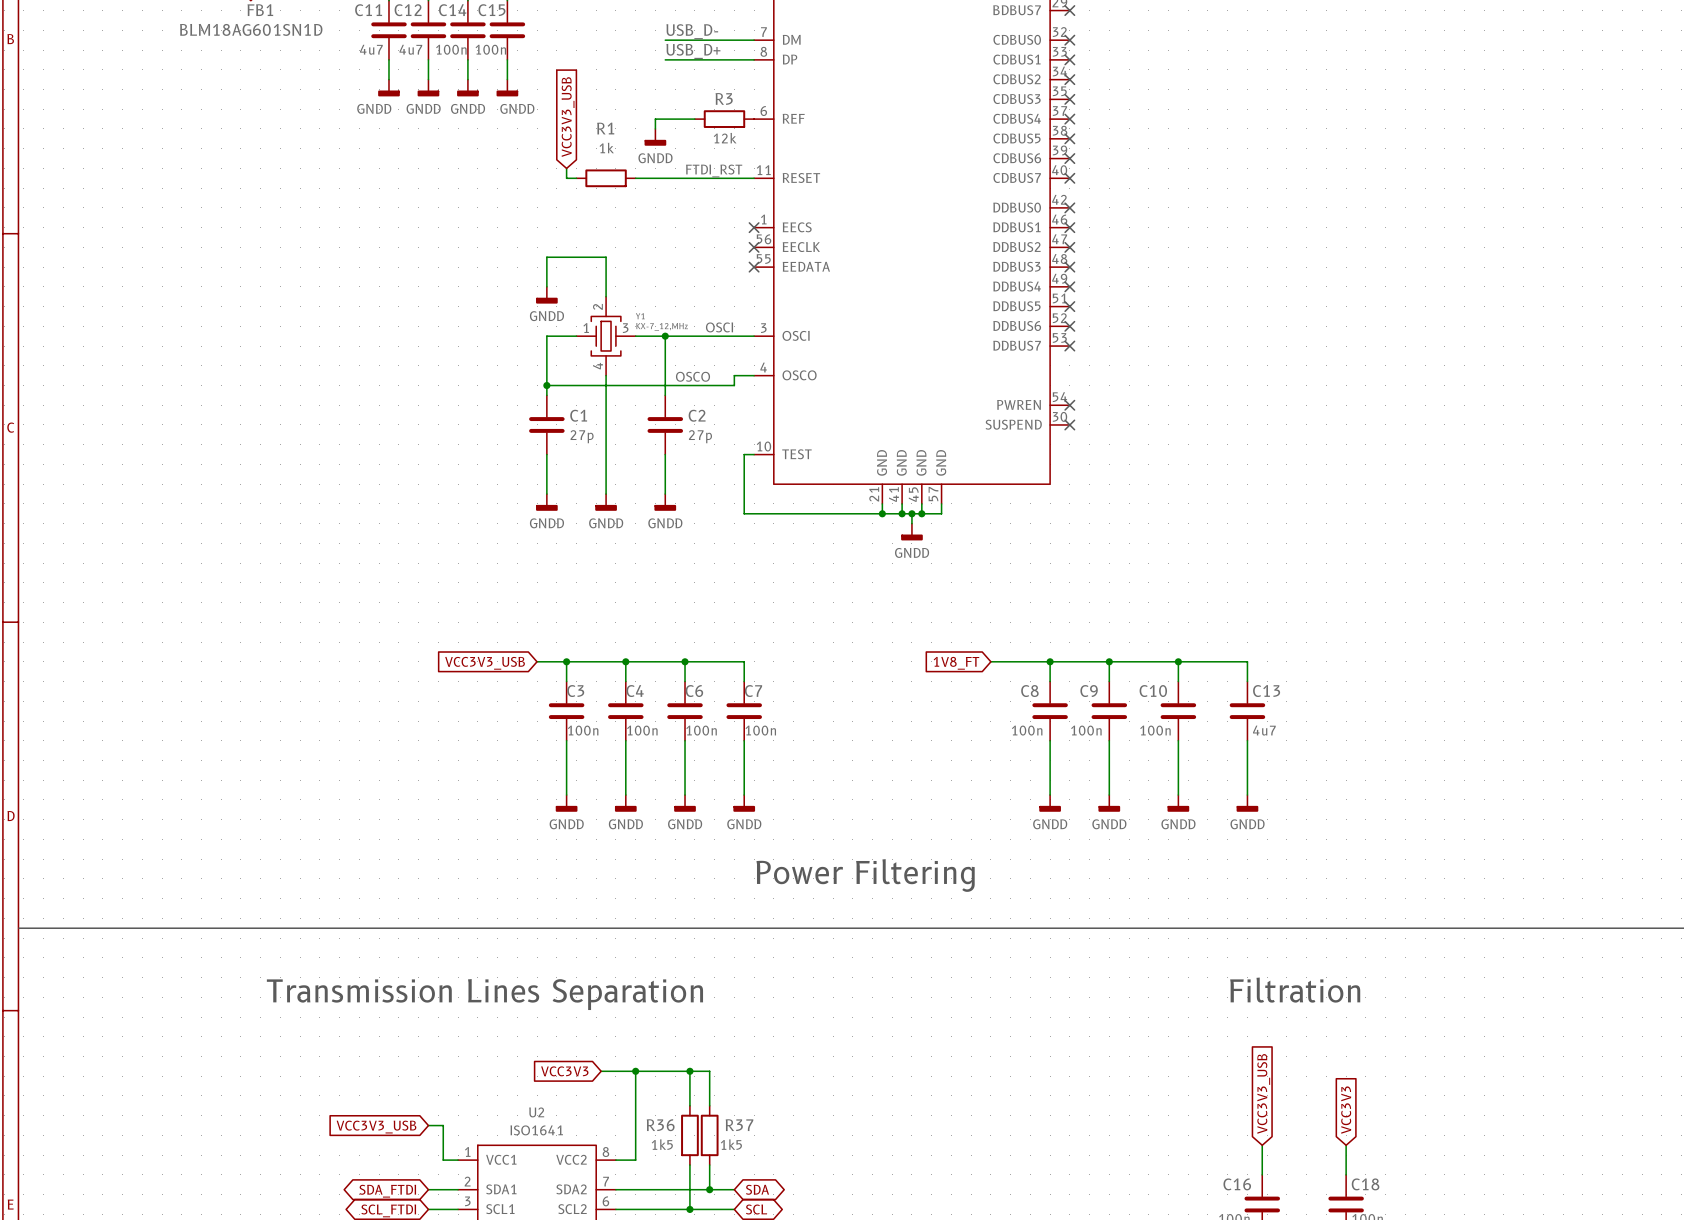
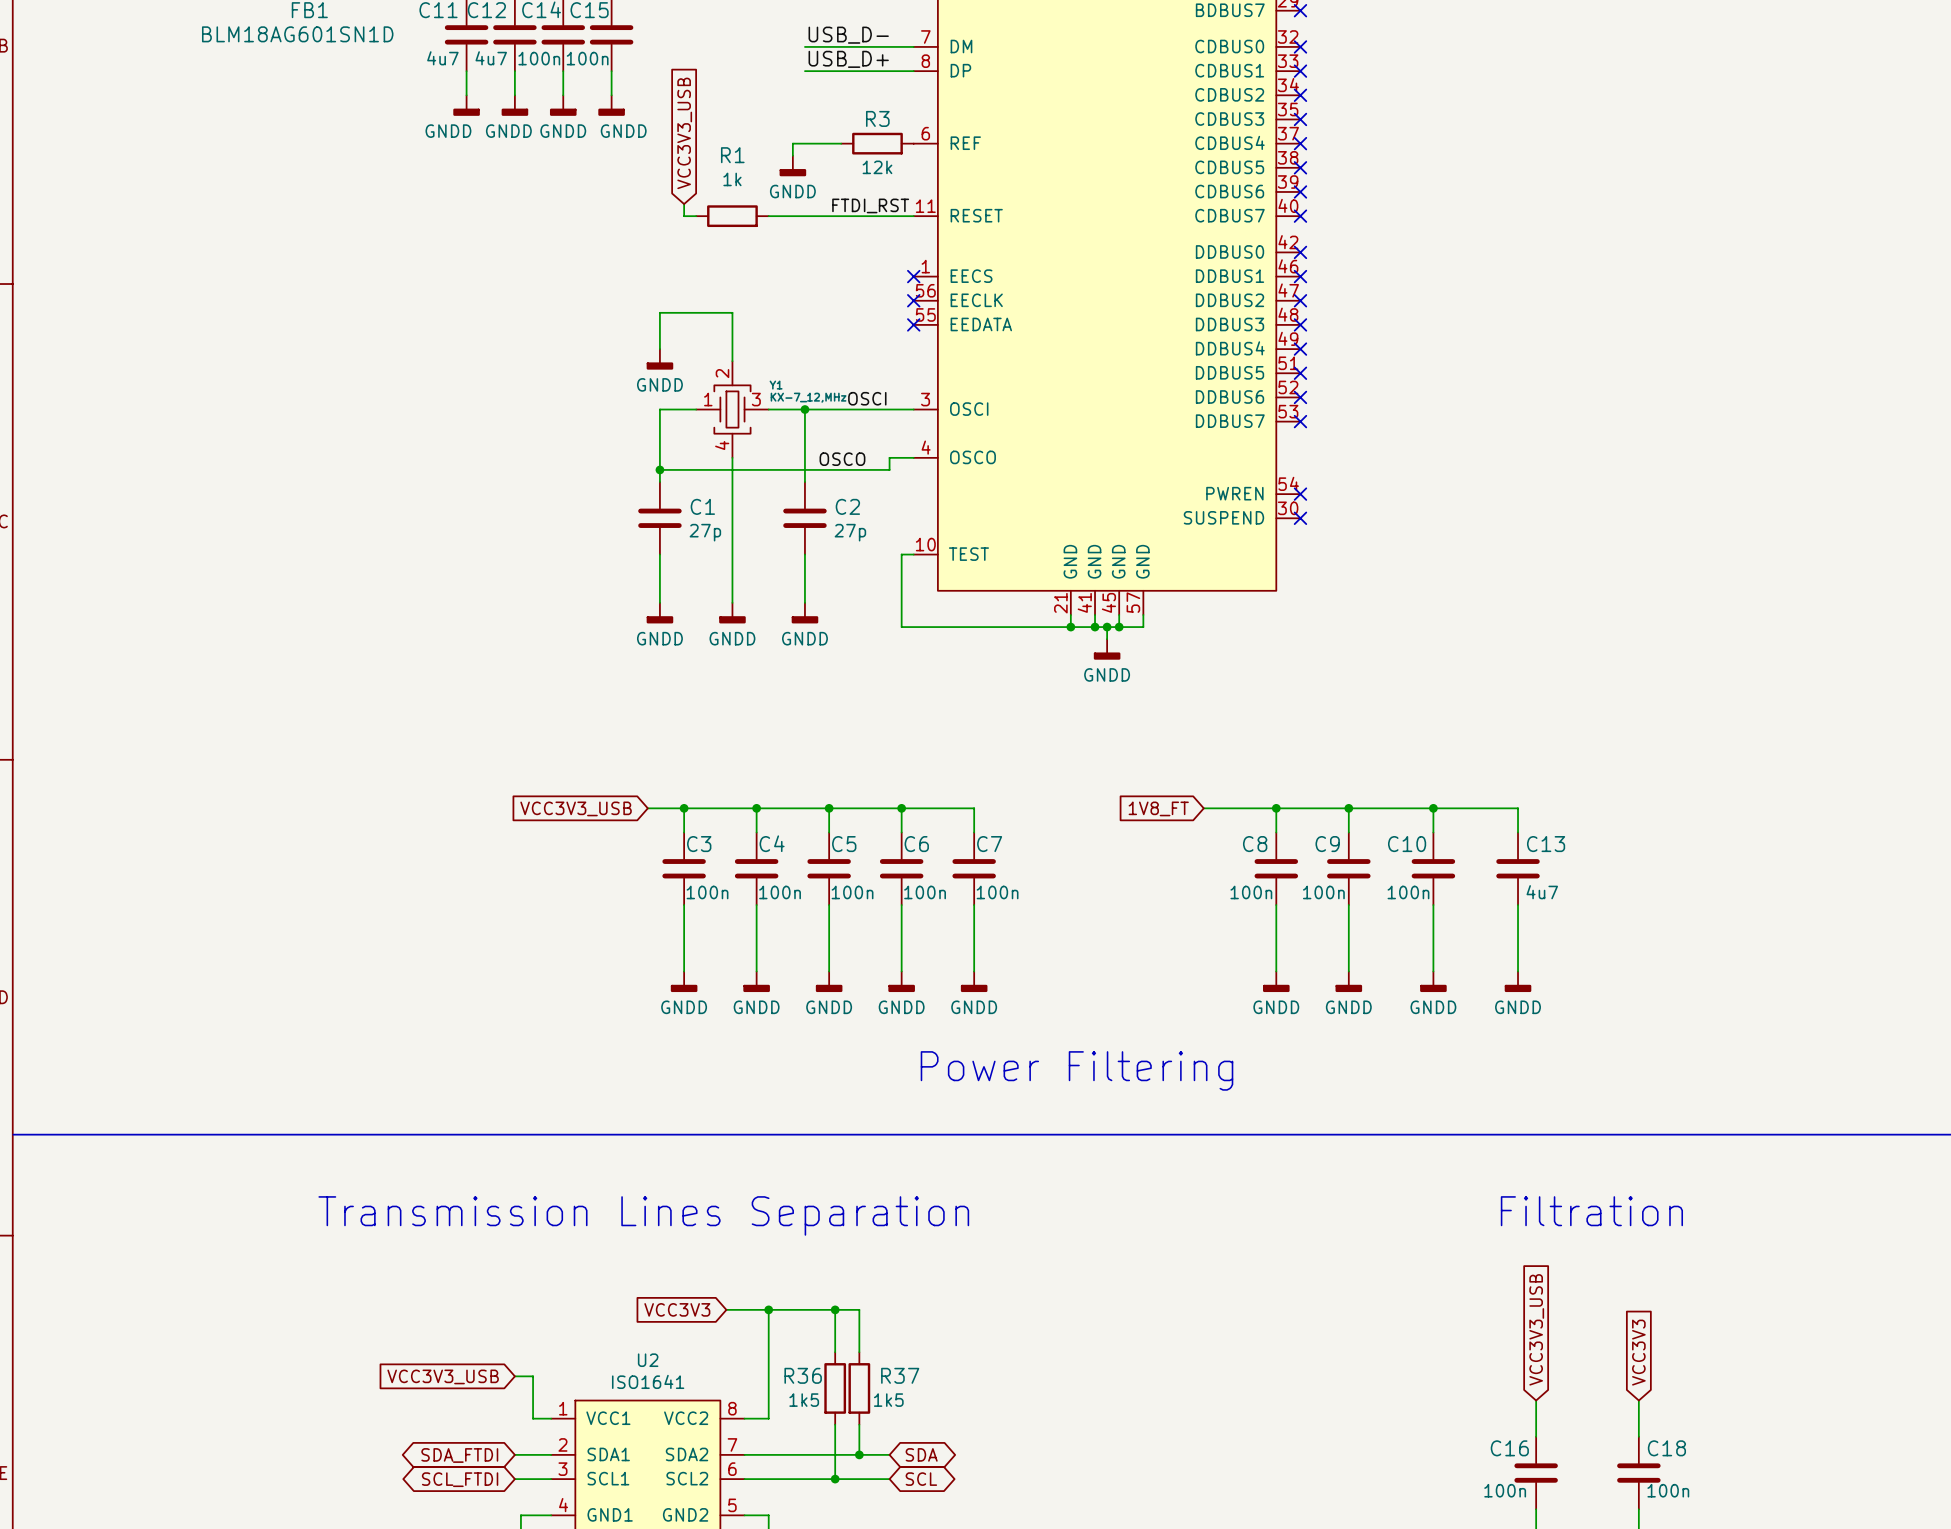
wire: none -> (901, 808) (974, 808) (974, 832)
junction: none -> (901, 808)
C6 name: C6 (694, 691) -> C5 (844, 844)
C7 name: C7 (753, 691) -> C6 (916, 844)
C7: none -> (974, 868)
wire: none -> (974, 905) (974, 971)
power symbol: none -> GNDD (974, 981)

